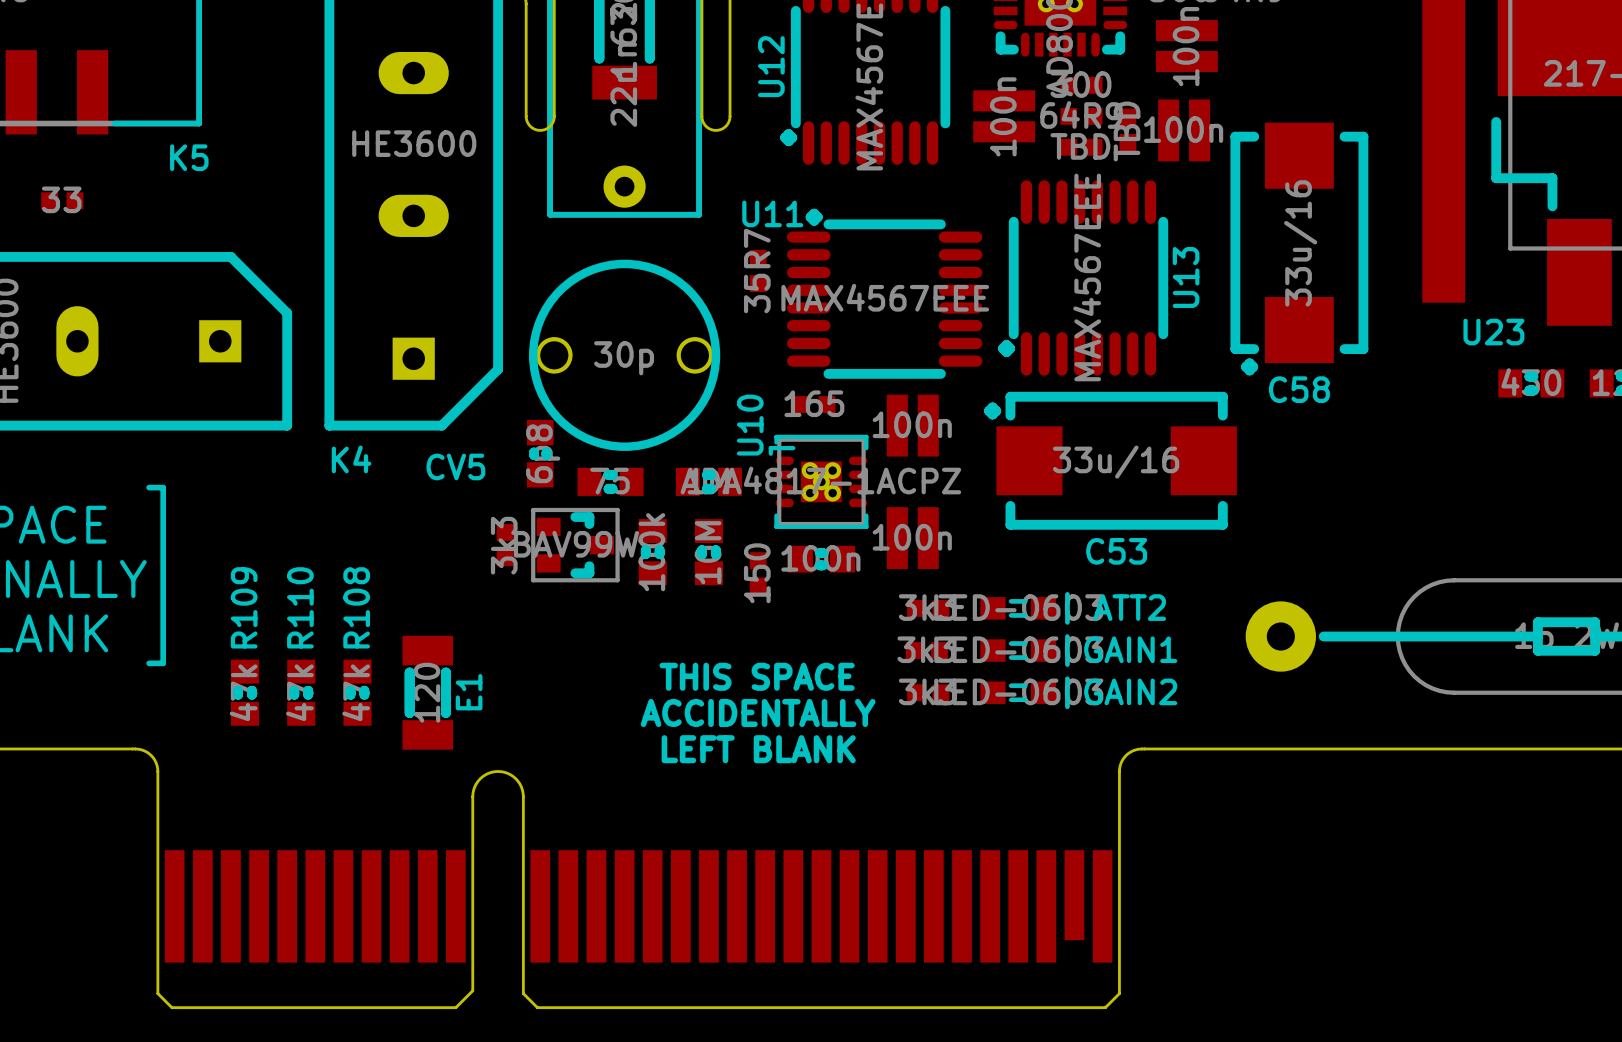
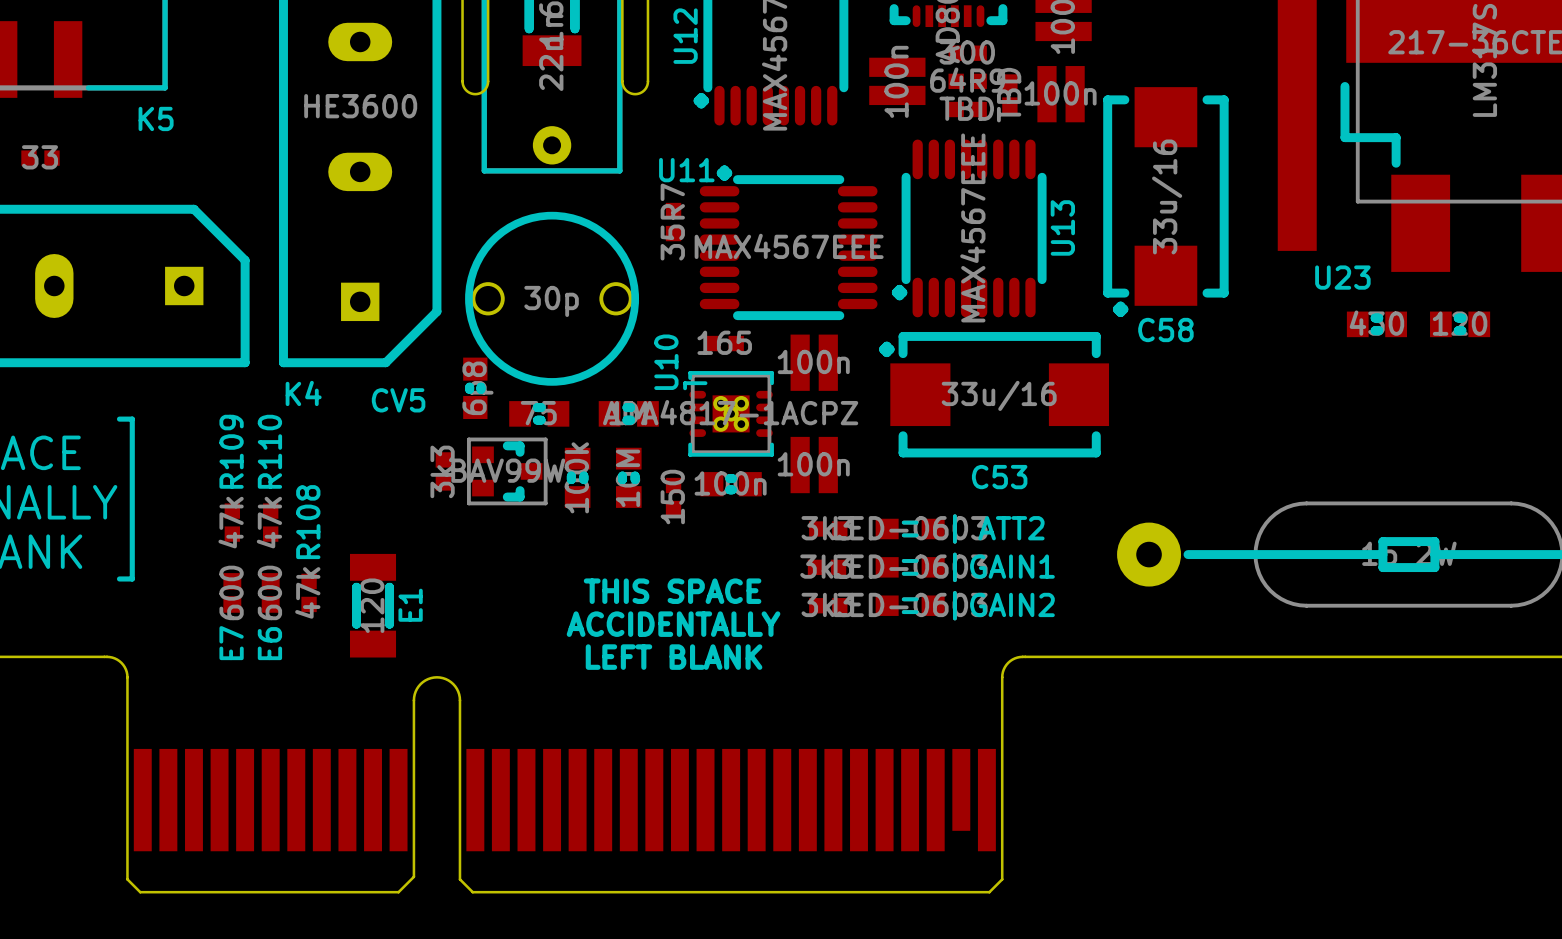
R109 footprint: [230, 659, 260, 726] -> [224, 503, 241, 542]
R110 footprint: [287, 659, 316, 726] -> [263, 503, 279, 542]
R108 footprint: [343, 659, 372, 726] -> [301, 573, 317, 613]
E7: none -> 600 (232, 592)
E6: none -> 600 (270, 592)

